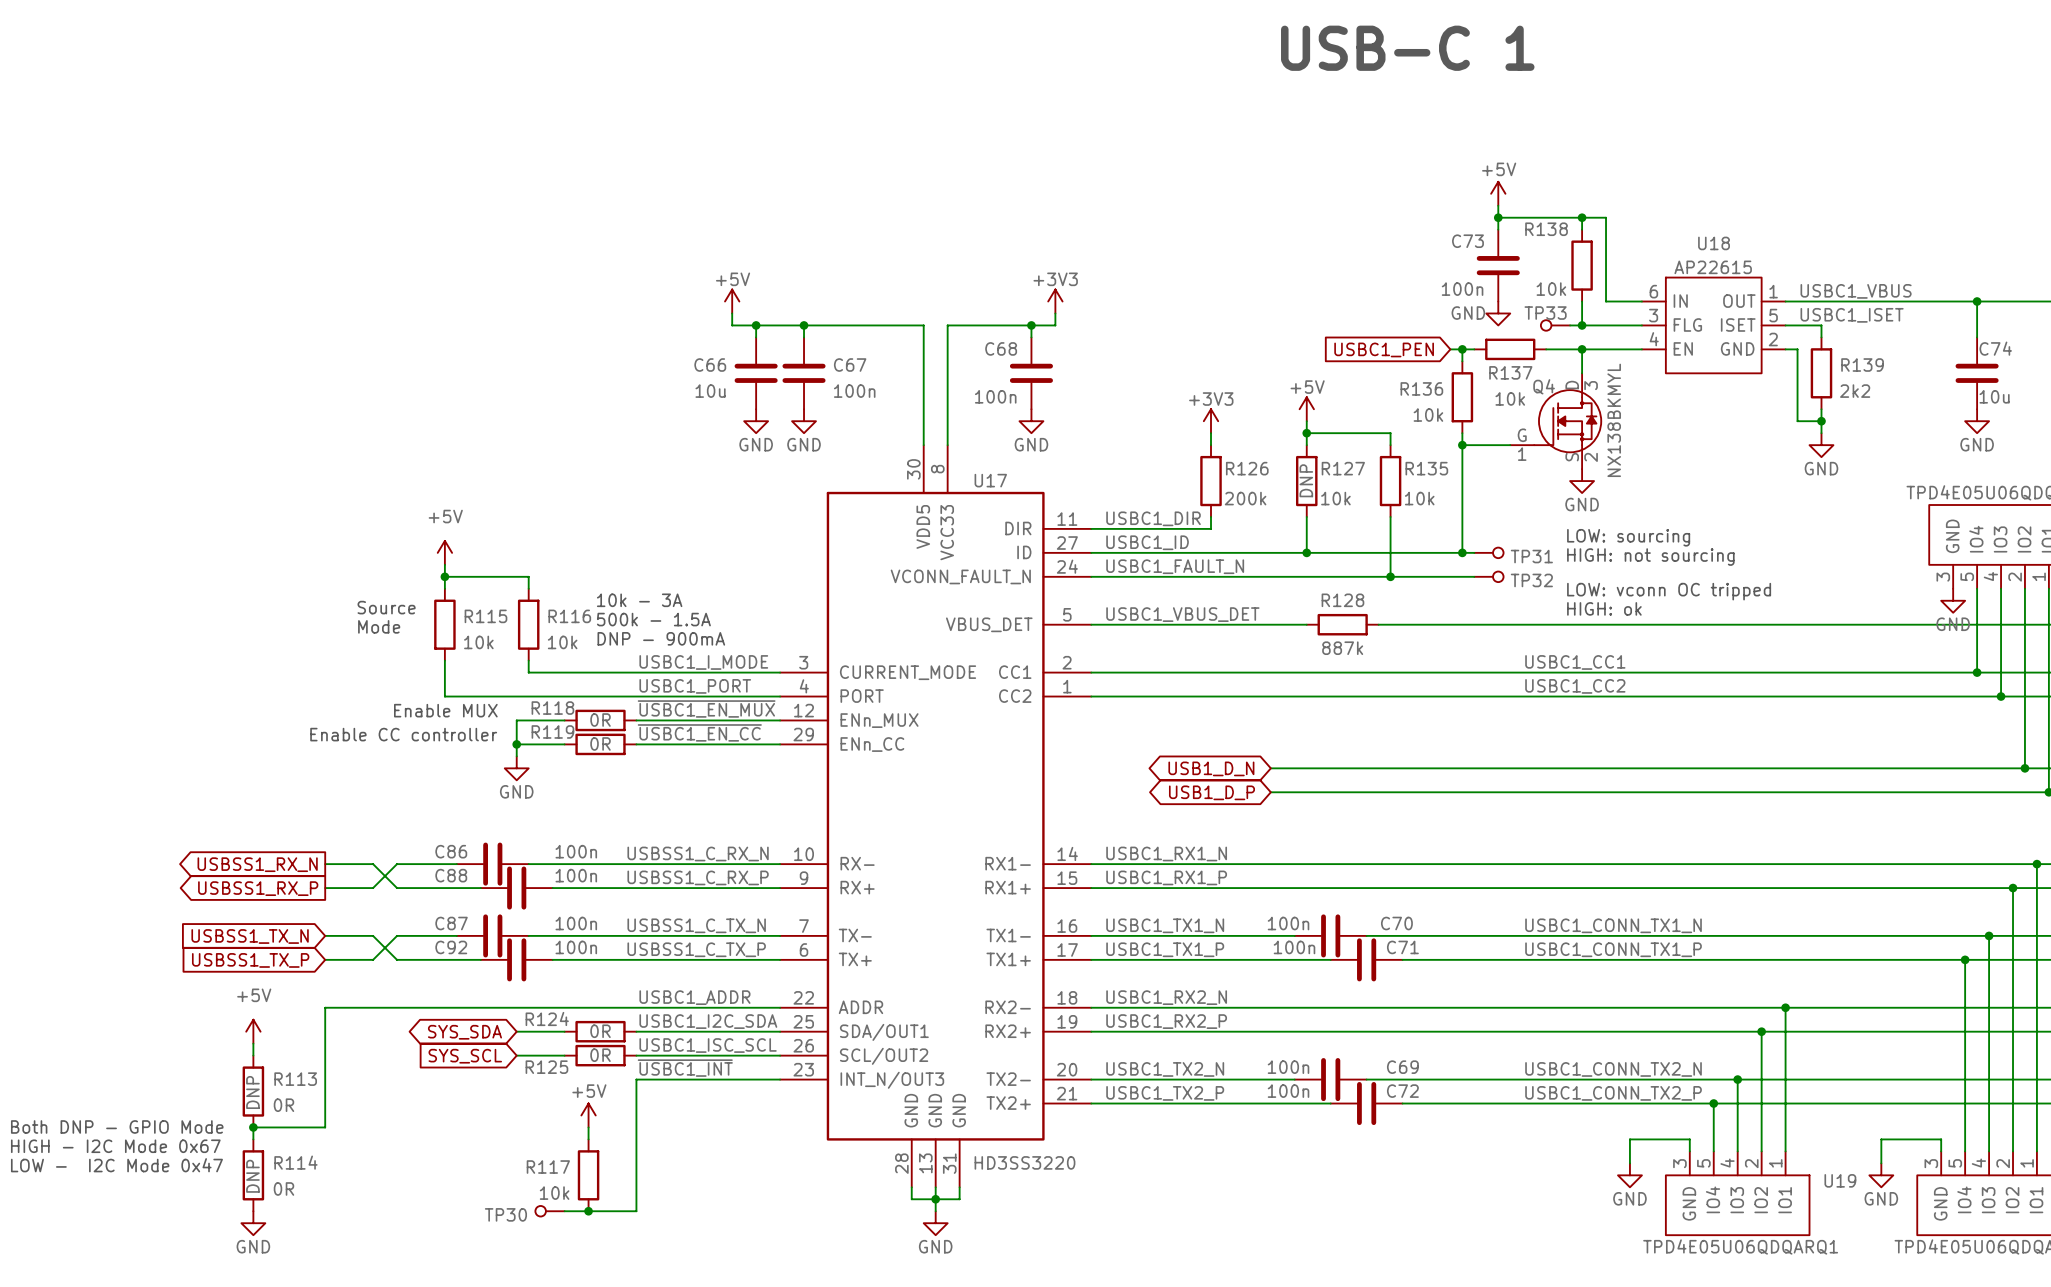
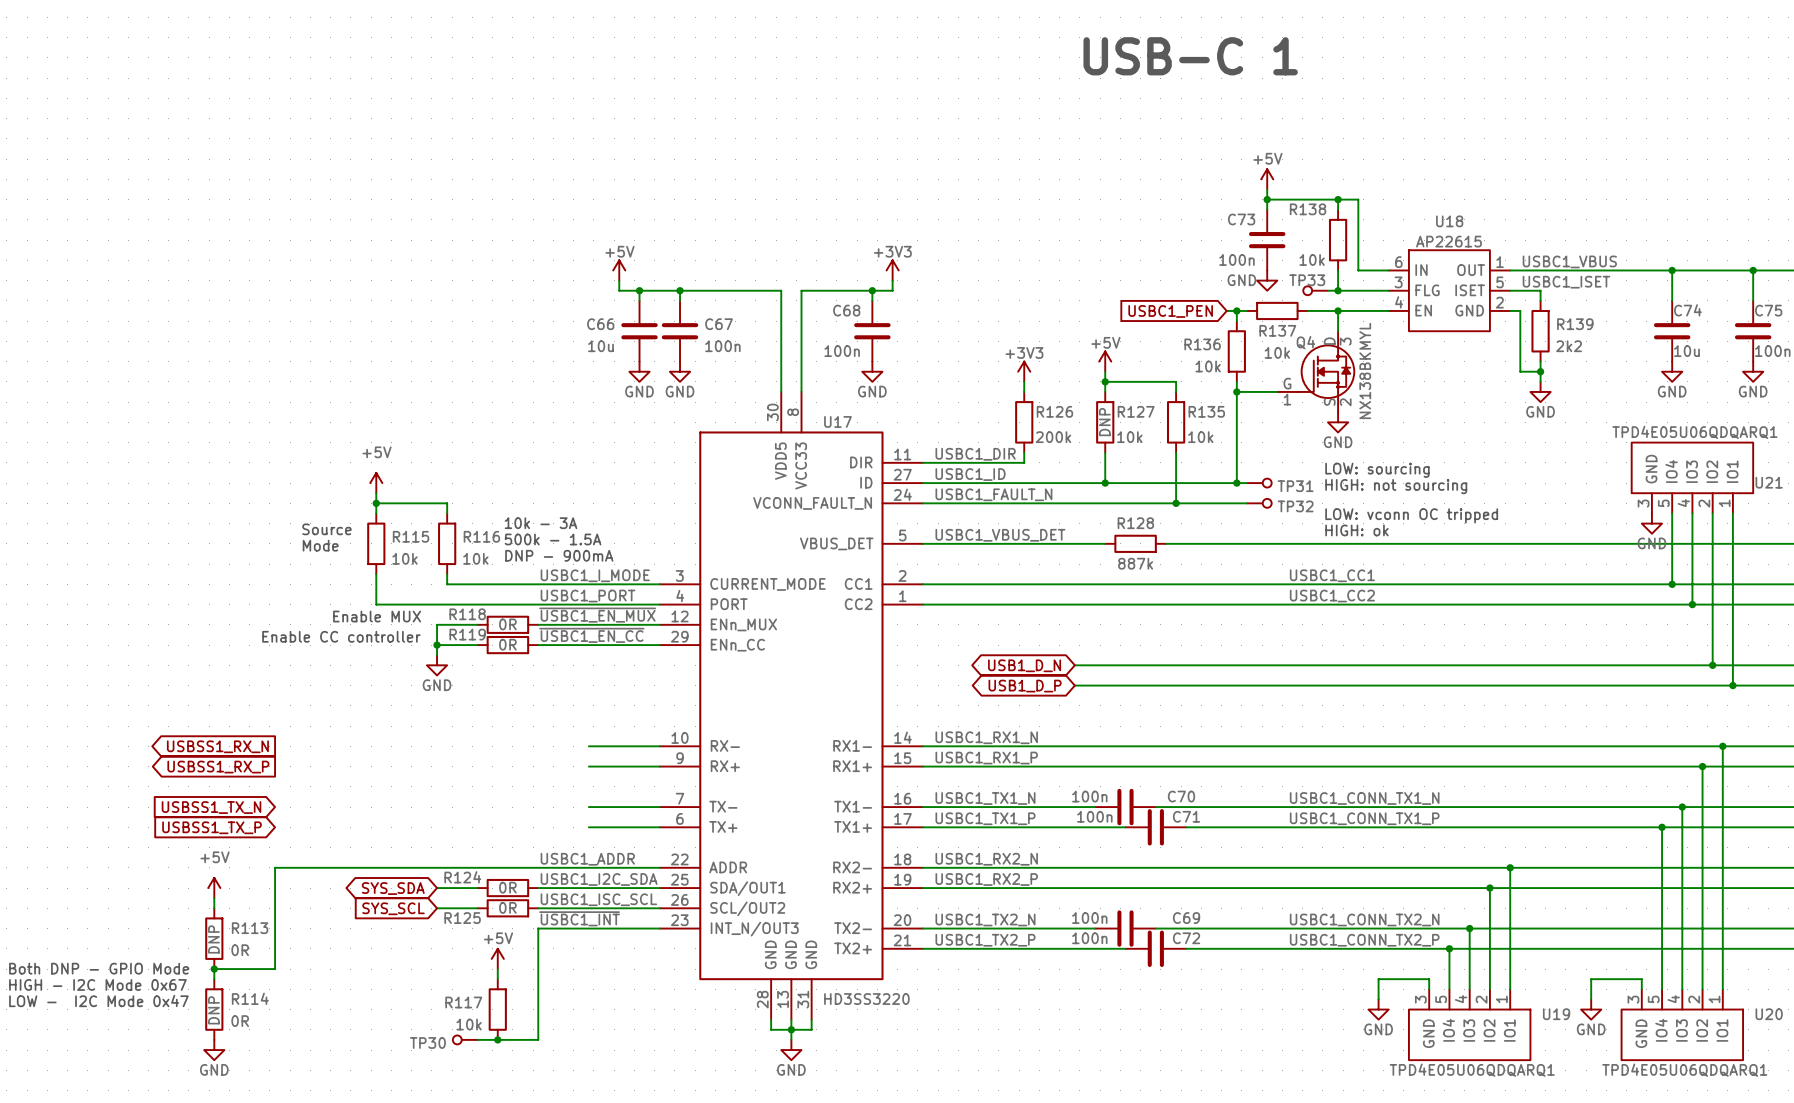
label: USBSS1_C_RX_N (698, 853) -> none
wire: (325, 864) (373, 864) (397, 888) (480, 888) -> none
wire: (456, 864) (397, 864) (373, 888) (325, 888) -> none
C86: (492, 864) -> none
wire: (528, 864) (696, 864) -> none
label: USBSS1_C_RX_P (698, 877) -> none
C88: (516, 888) -> none
wire: (552, 888) (696, 888) -> none
label: USBSS1_C_TX_N (696, 925) -> none
wire: (325, 935) (373, 935) (397, 959) (480, 959) -> none
wire: (456, 935) (397, 935) (373, 959) (325, 959) -> none
C87: (492, 935) -> none
wire: (528, 935) (696, 935) -> none
label: USBSS1_C_TX_P (696, 949) -> none
C92: (516, 959) -> none
wire: (552, 959) (696, 959) -> none

